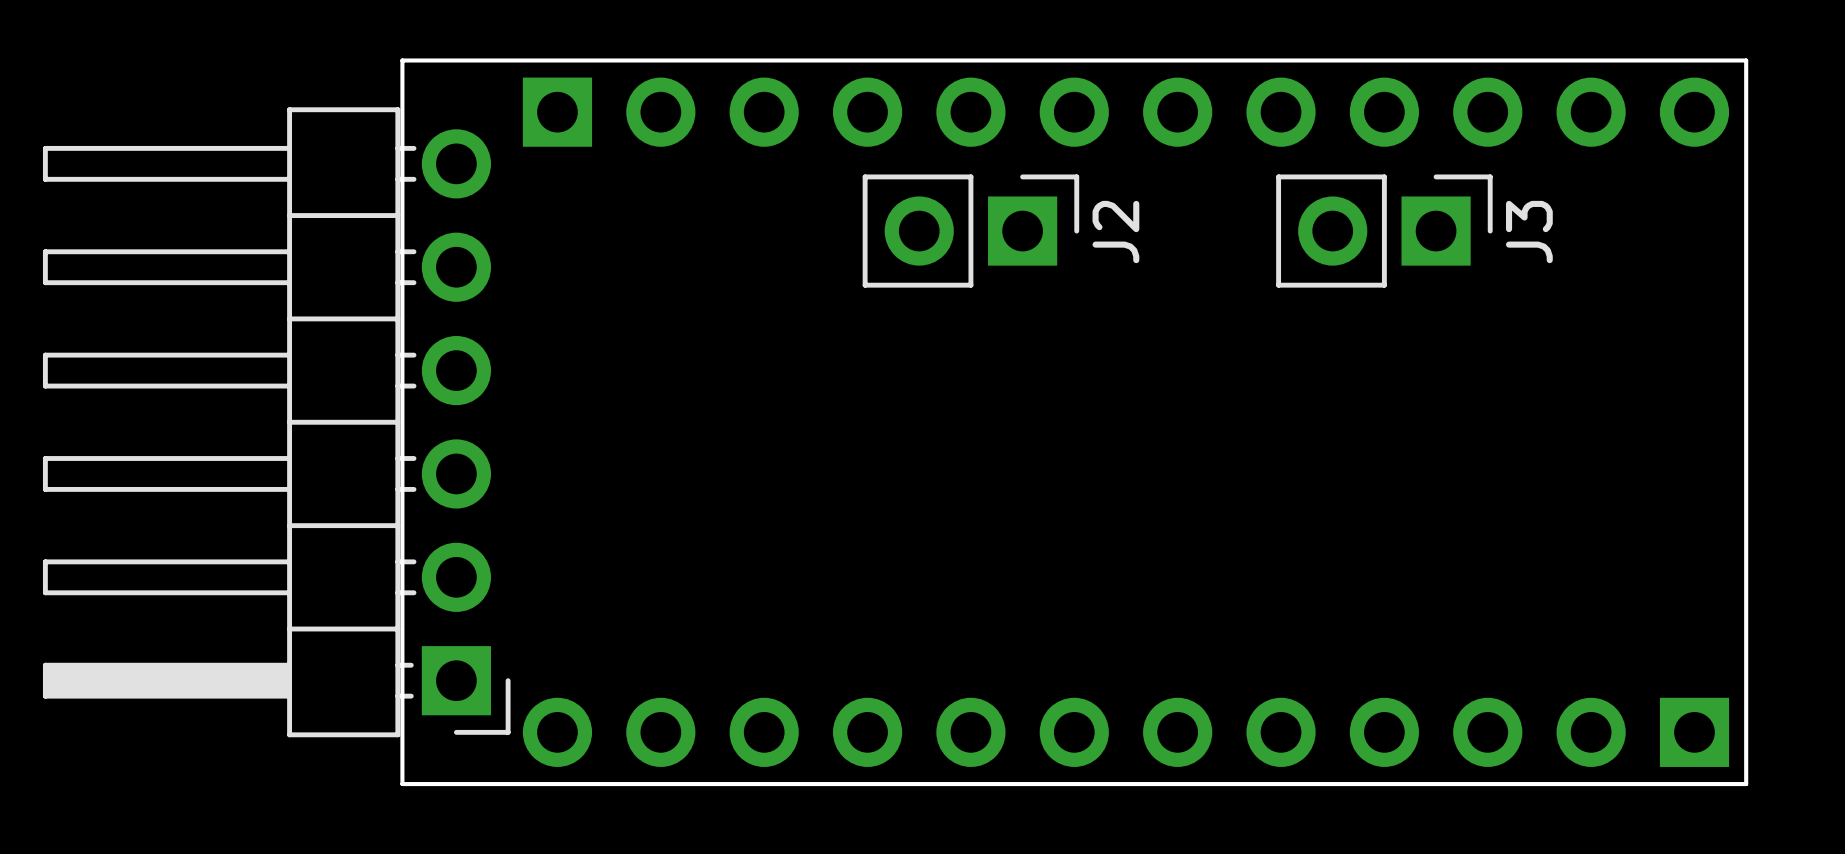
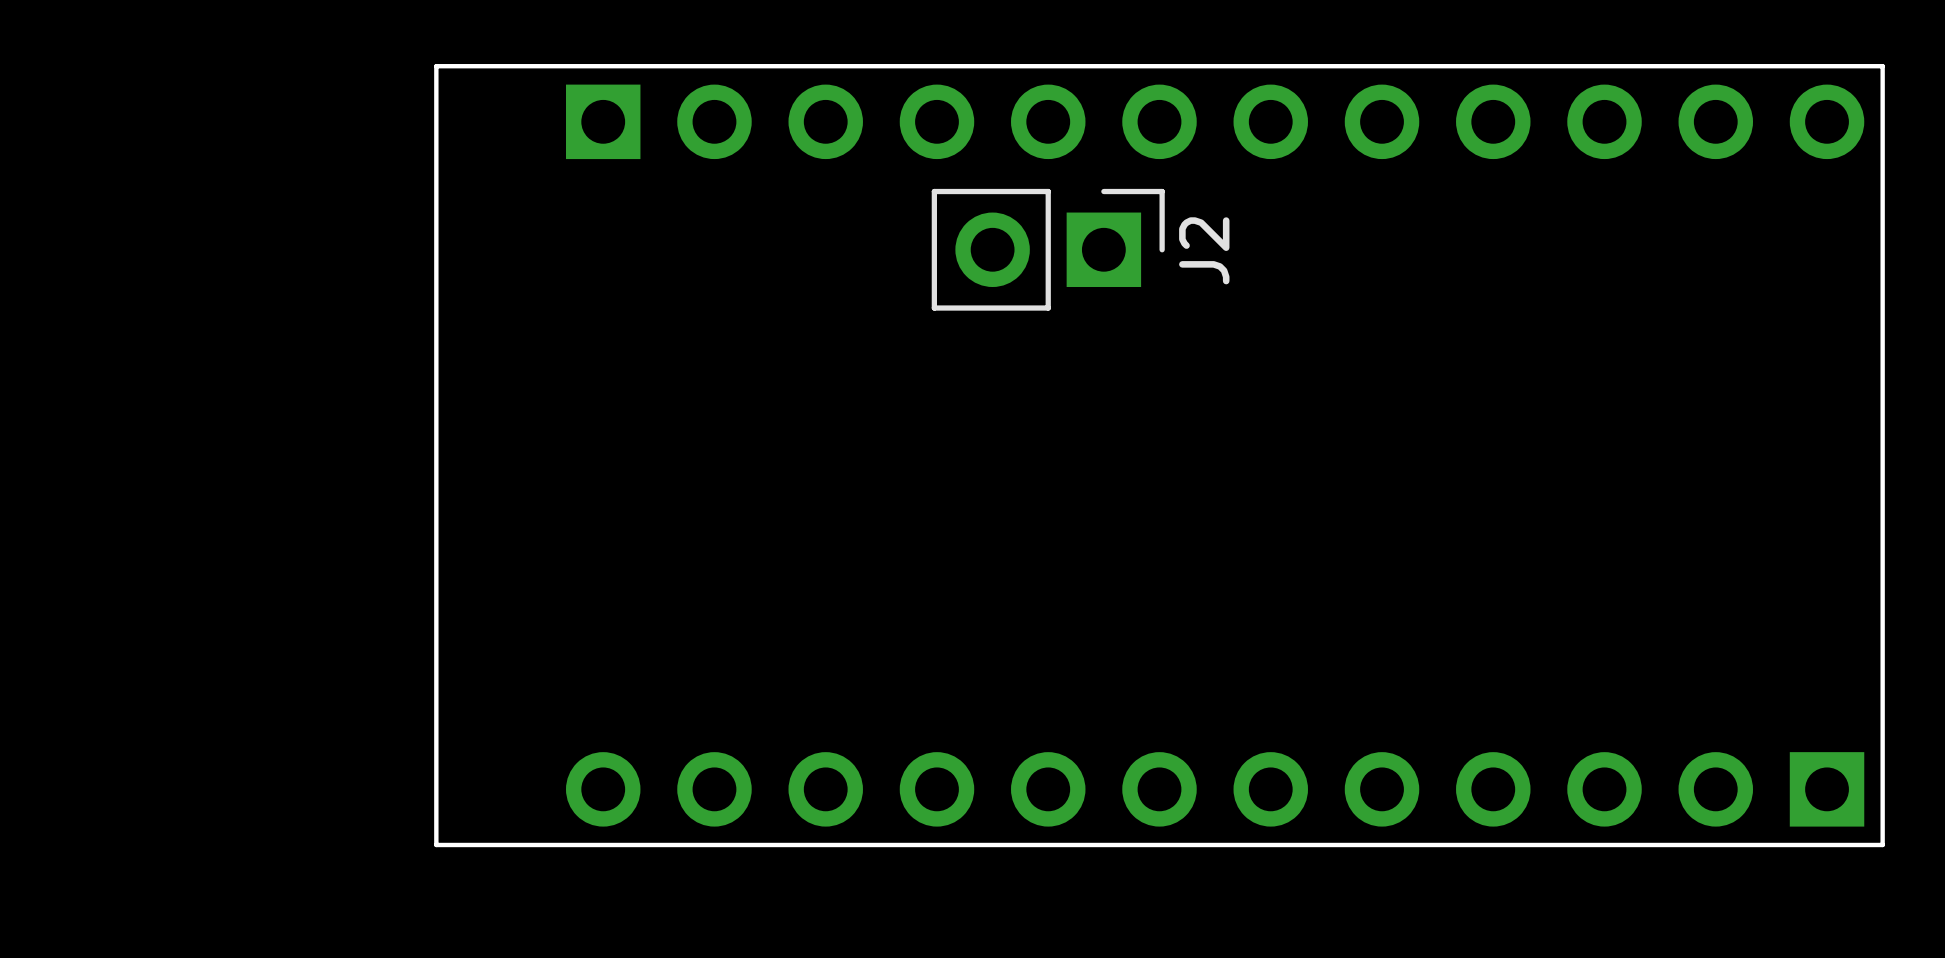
J3: (1384, 231) -> none
part: (276, 422) -> none

